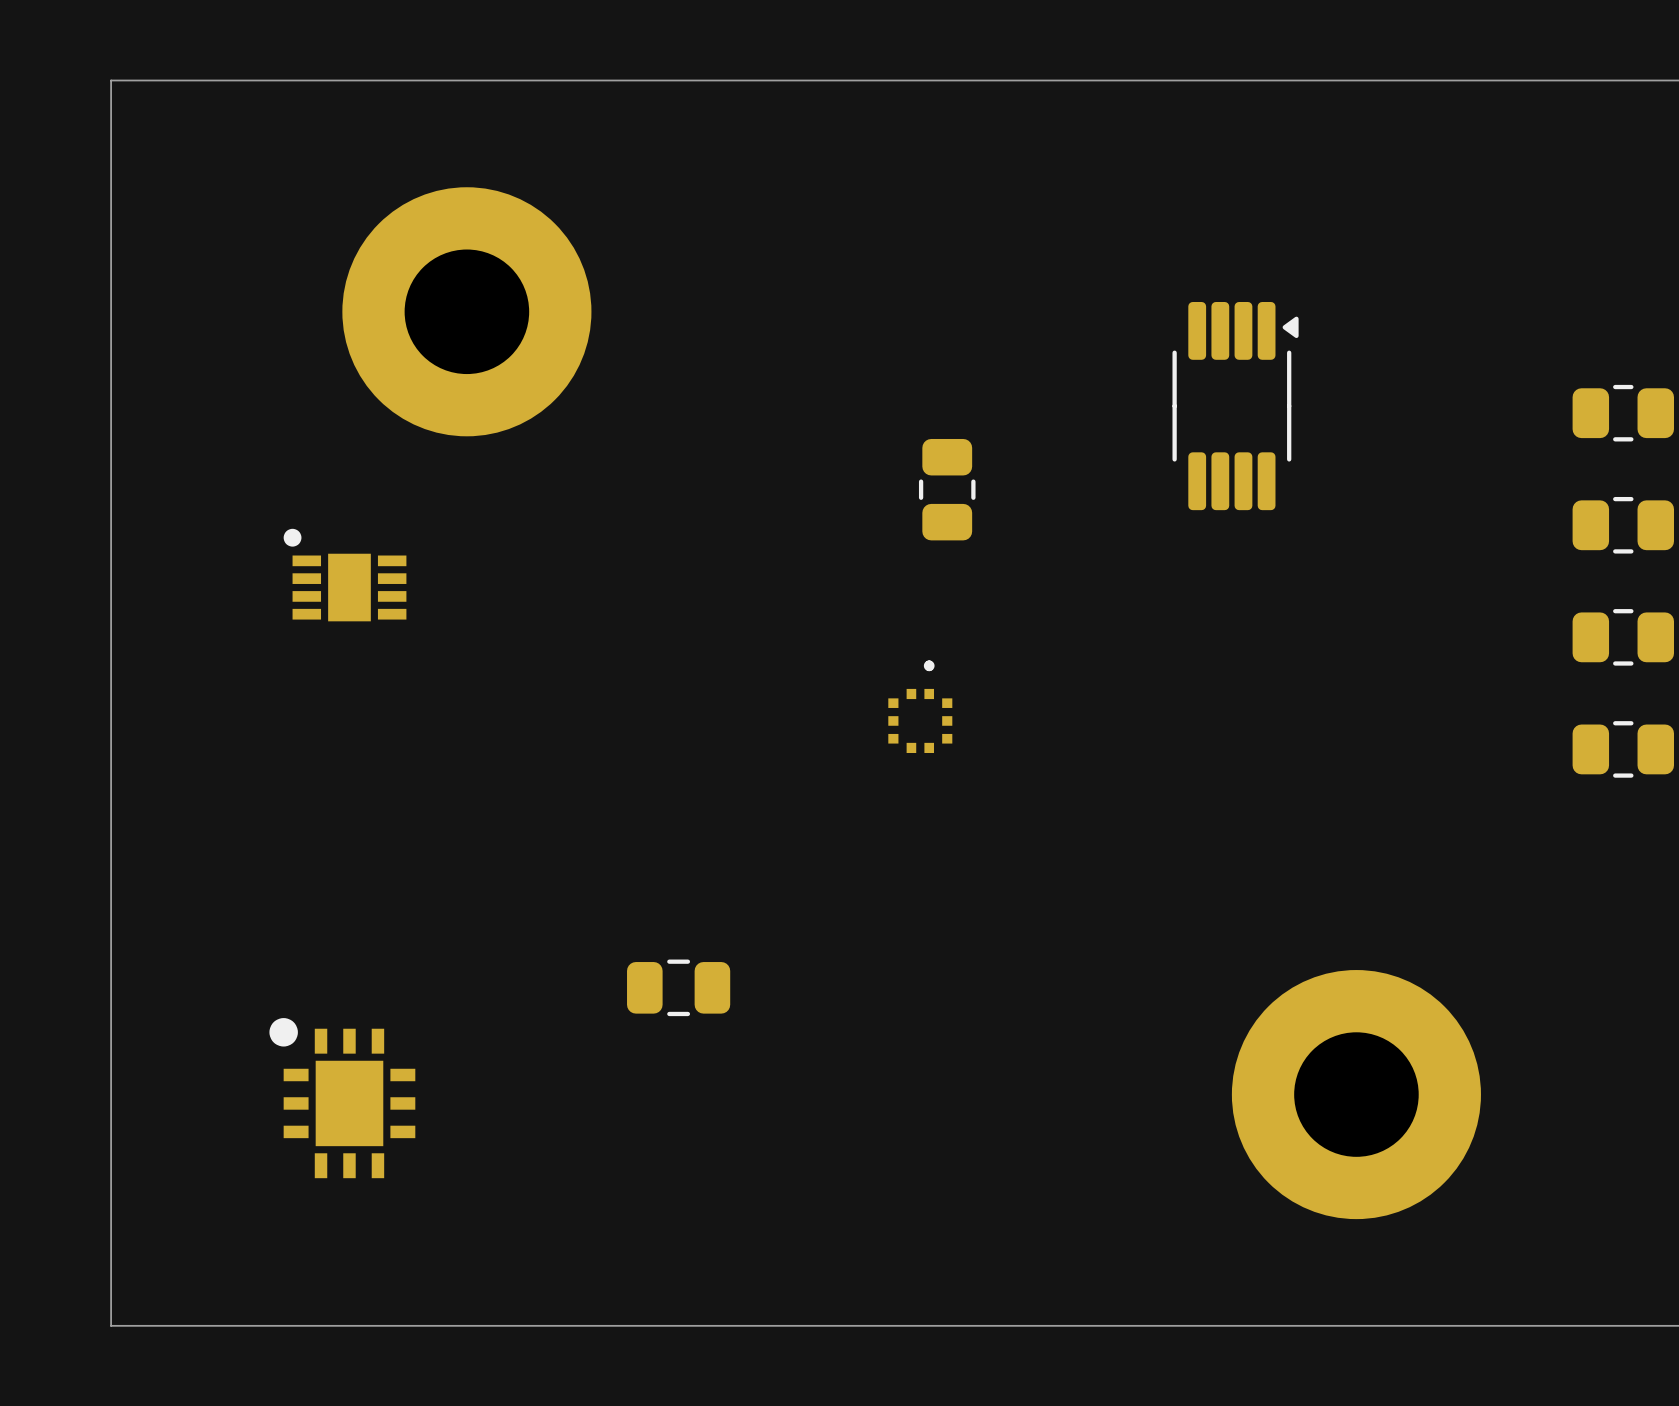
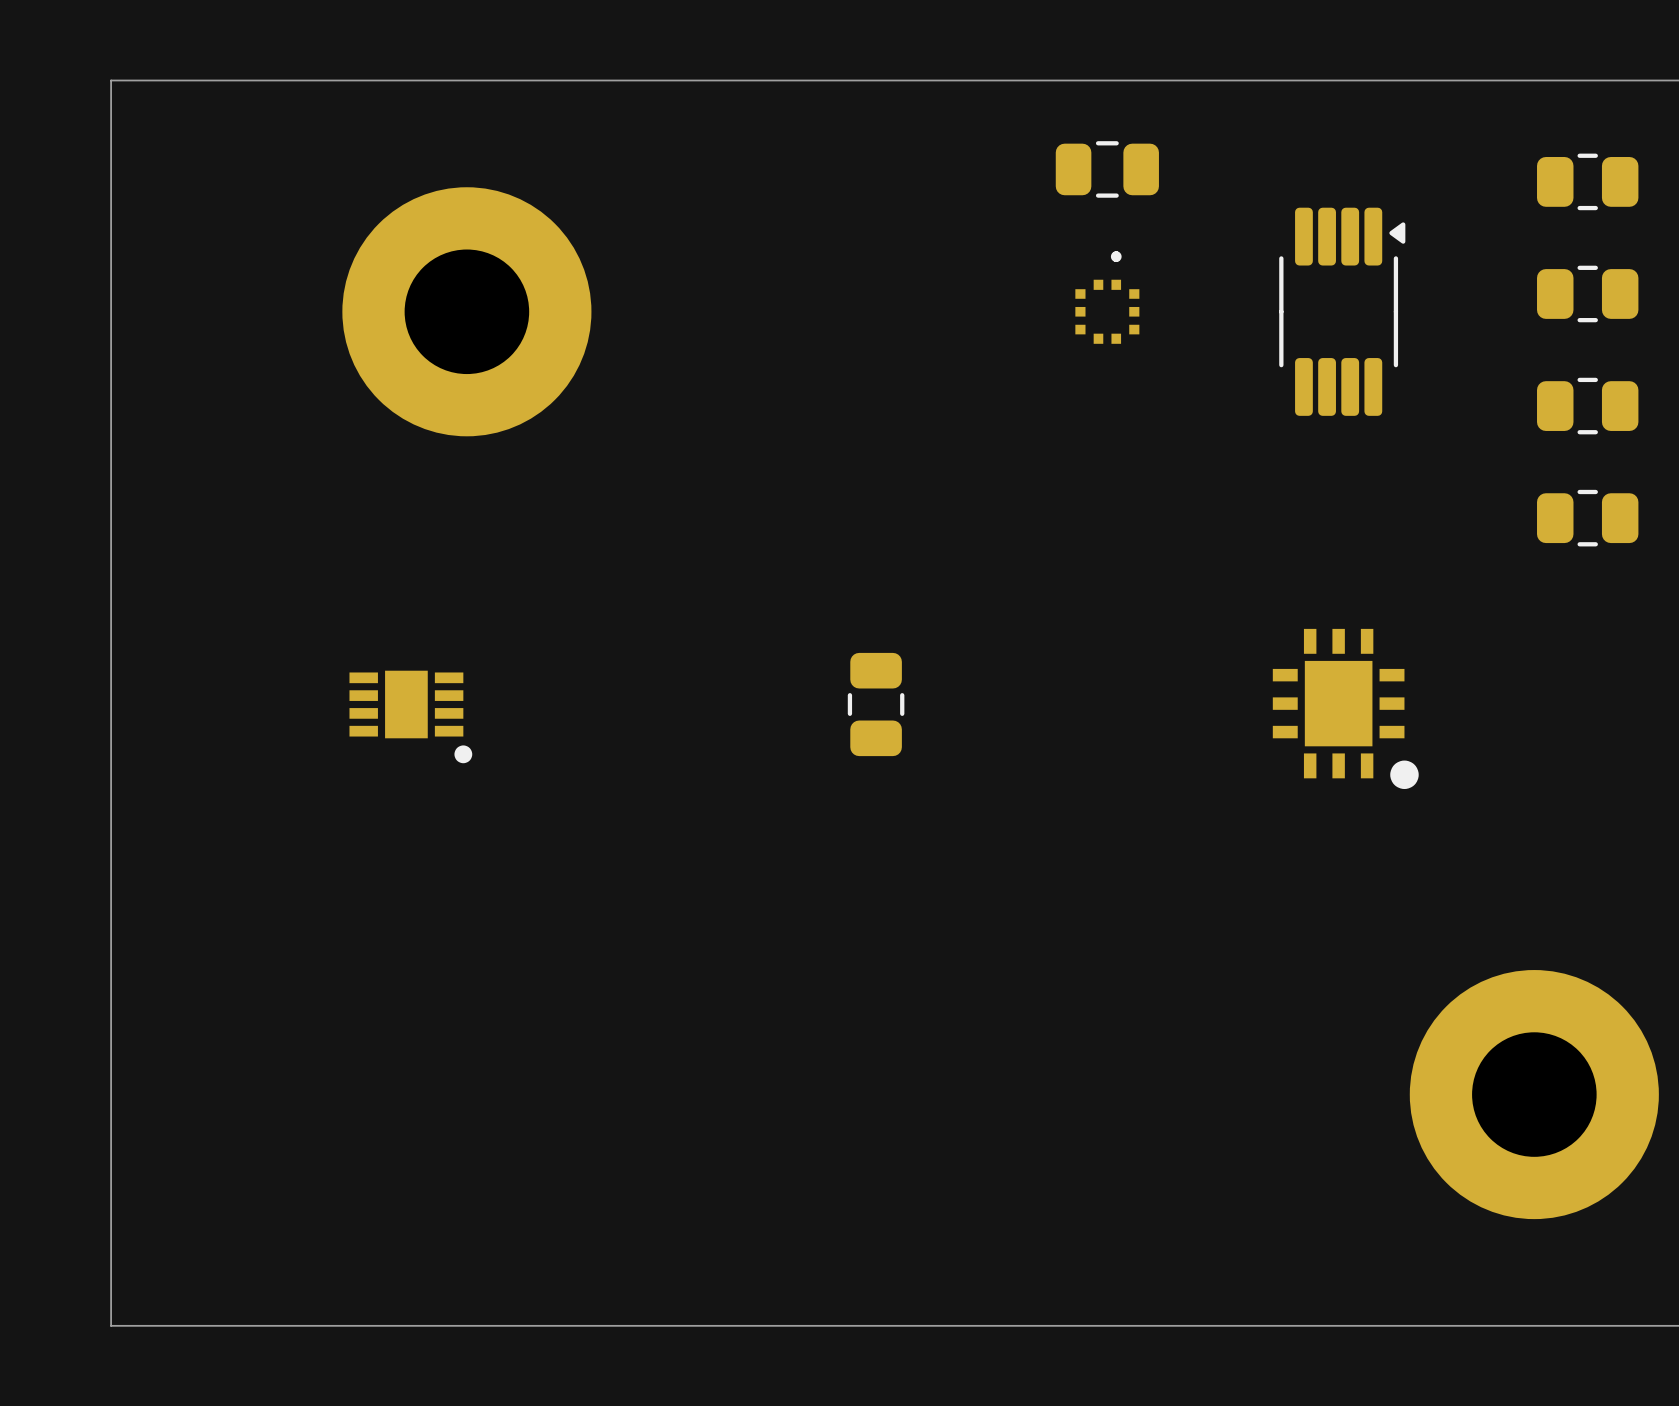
part: none -> (1107, 169)
part: none -> (1587, 181)
part: none -> (1587, 293)
part position: (1235, 406) -> (1342, 311)
part position: (1623, 413) -> (1587, 406)
part: (947, 489) -> none
part position: (1623, 525) -> (1587, 518)
part rotation: 0° (345, 575) -> 180° (410, 716)
part position: (345, 575) -> (410, 716)
part: (1623, 637) -> none
part position: (920, 706) -> (1107, 297)
part: none -> (1345, 708)
part: (1623, 749) -> none
part rotation: 0° (678, 987) -> 90° clockwise (876, 704)
part position: (678, 987) -> (876, 704)
part position: (1356, 1094) -> (1534, 1094)
part: (342, 1098) -> none

